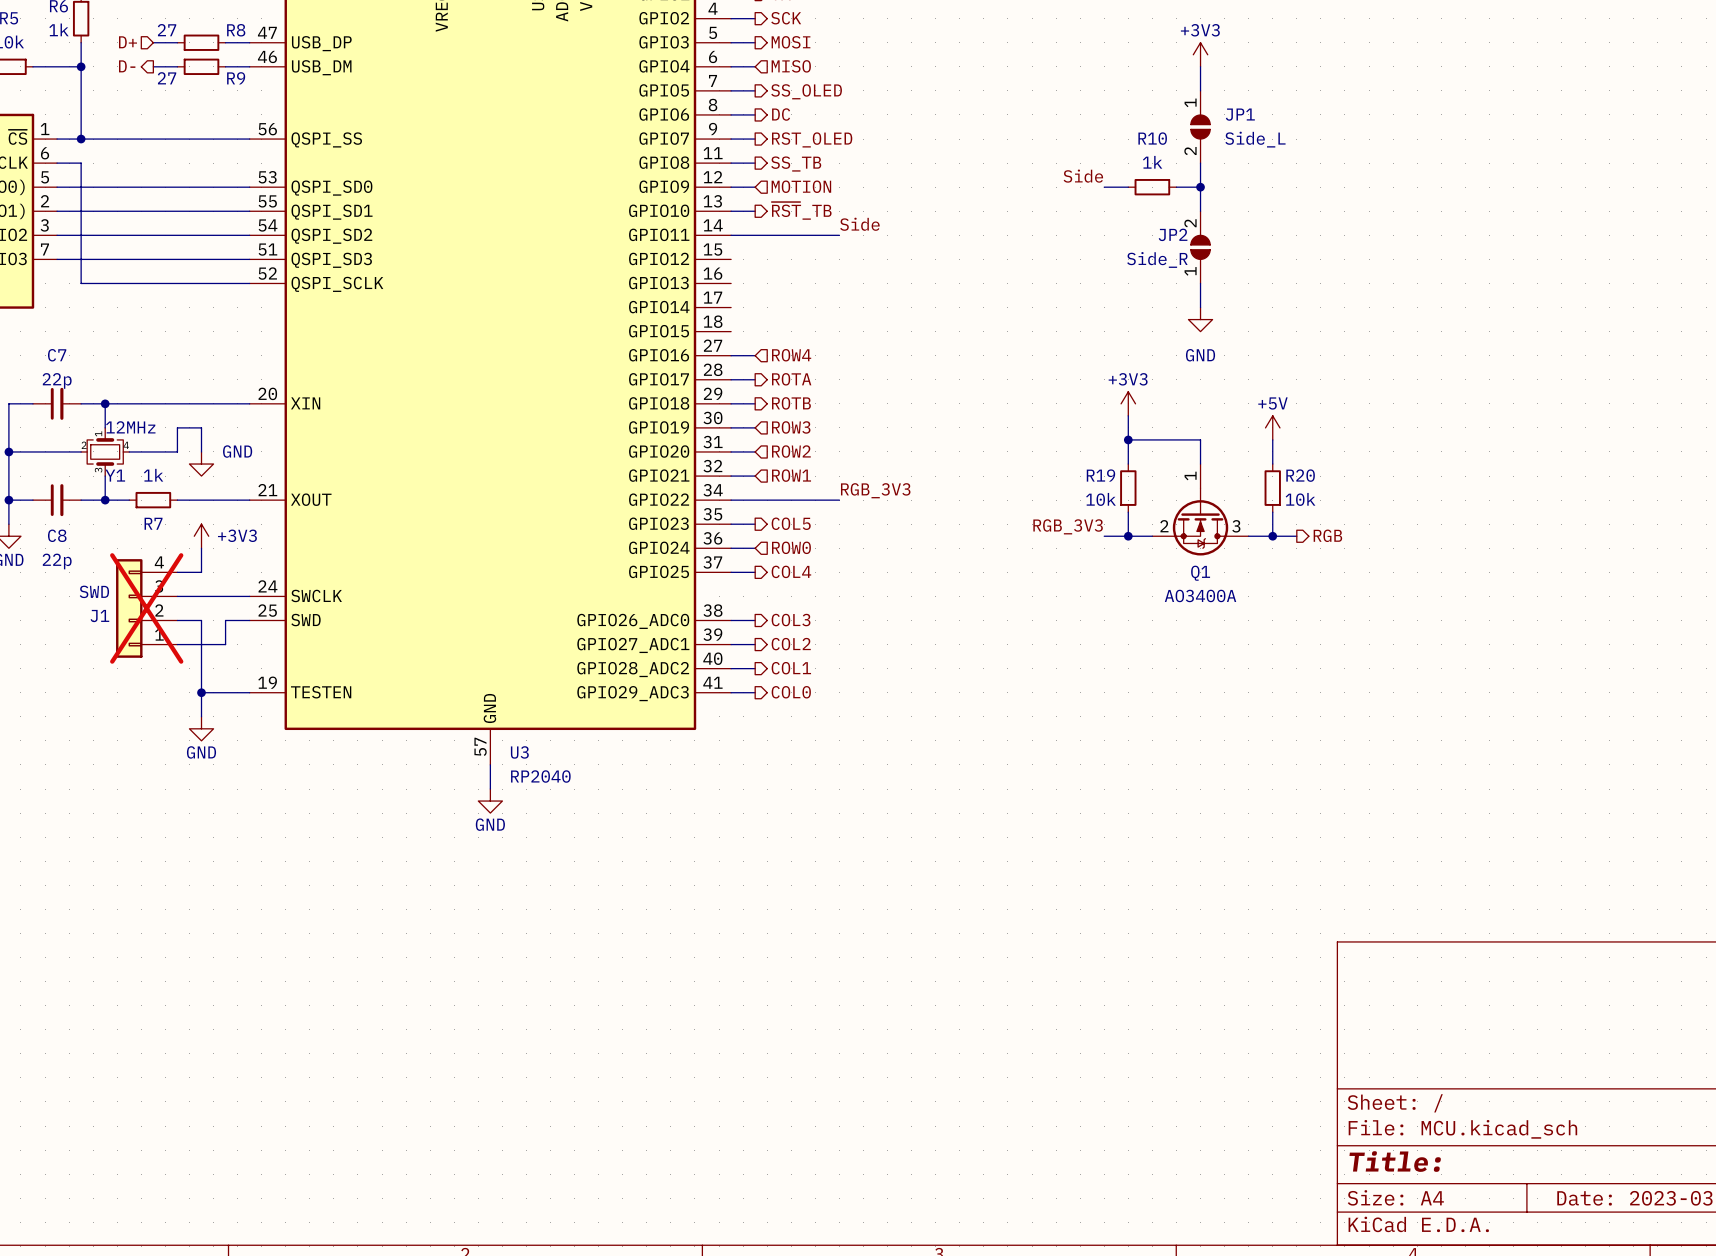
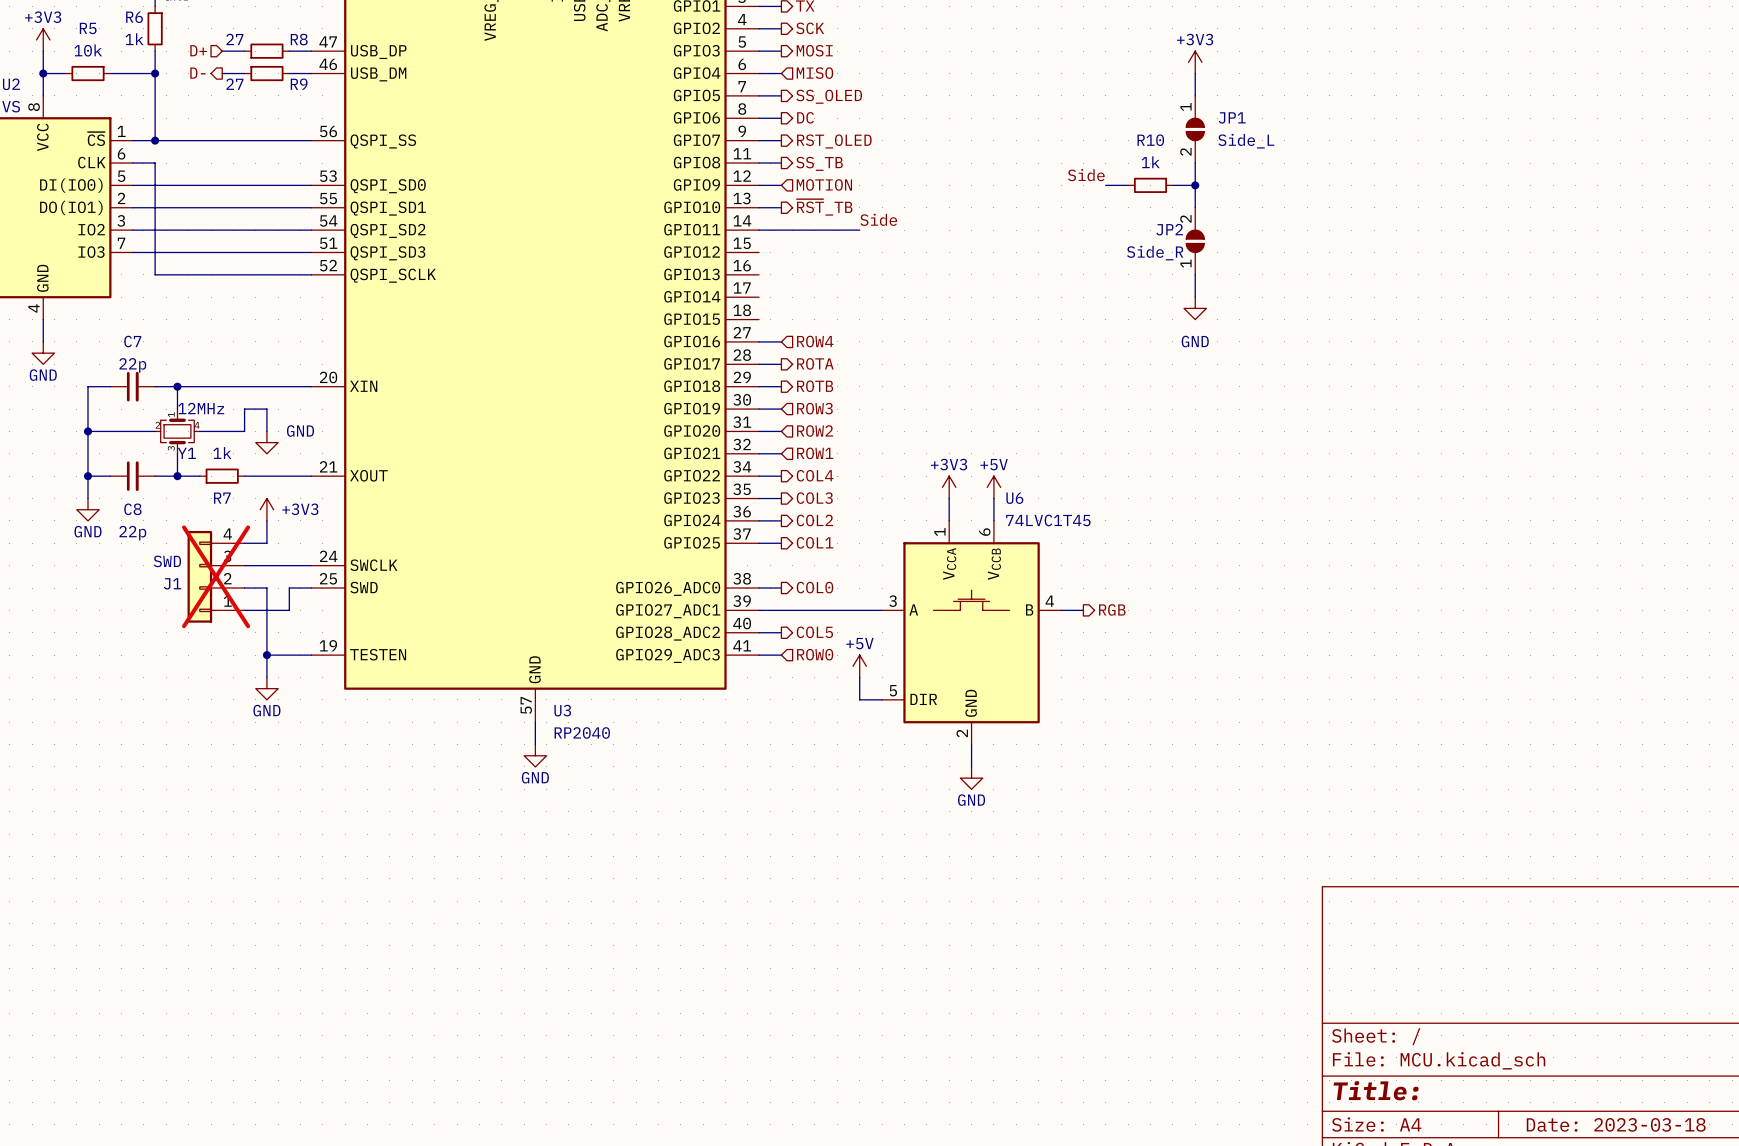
power symbol position: +3V3 (1128, 403) -> +3V3 (949, 487)
wire: (1128, 415) (1128, 464) -> none
power symbol: +5V (1272, 427) -> none
wire: (1128, 439) (1200, 439) (1200, 464) -> none
junction: (1128, 439) -> none
wire: (1272, 439) (1272, 464) -> none
R19: 10k (1128, 488) -> none
R20: 10k (1272, 488) -> none
label: RGB_3V3 (875, 490) -> none
hierarchical label: none -> COL4 (815, 475)
wire: (755, 500) (839, 500) -> none
Q1: AO3400A (1200, 509) -> none
power symbol: none -> +5V (993, 487)
wire: (1128, 512) (1128, 536) -> (993, 498) (993, 520)
wire: (1272, 512) (1272, 536) -> none
hierarchical label: COL5 (791, 523) -> COL3 (814, 498)
wire: none -> (949, 498) (949, 520)
label: RGB_3V3 (1068, 526) -> none
hierarchical label: RGB (1327, 535) -> none
wire: (1104, 536) (1152, 536) -> none
junction: (1128, 536) -> none
wire: (1248, 536) (1296, 536) -> none
junction: (1272, 536) -> none
hierarchical label shape: input (791, 547) -> output (814, 520)
hierarchical label: ROW0 (791, 547) -> COL2 (814, 520)
hierarchical label: COL4 (791, 571) -> COL1 (815, 542)
hierarchical label: COL3 (791, 620) -> COL0 (814, 587)
wire: none -> (781, 610) (882, 610)
hierarchical label: COL2 (791, 644) -> none
wire: none -> (1061, 610) (1083, 610)
hierarchical label: none -> RGB (1112, 609)
hierarchical label: COL1 (791, 668) -> COL5 (814, 632)
U6: none -> 74LVC1T45 (971, 632)
hierarchical label shape: output (791, 692) -> input (815, 654)
hierarchical label: COL0 (791, 692) -> ROW0 (815, 654)
power symbol: none -> +5V (859, 666)
wire: none -> (859, 677) (859, 699) (882, 699)
wire: none -> (971, 744) (971, 766)
power symbol: none -> GND (971, 778)

